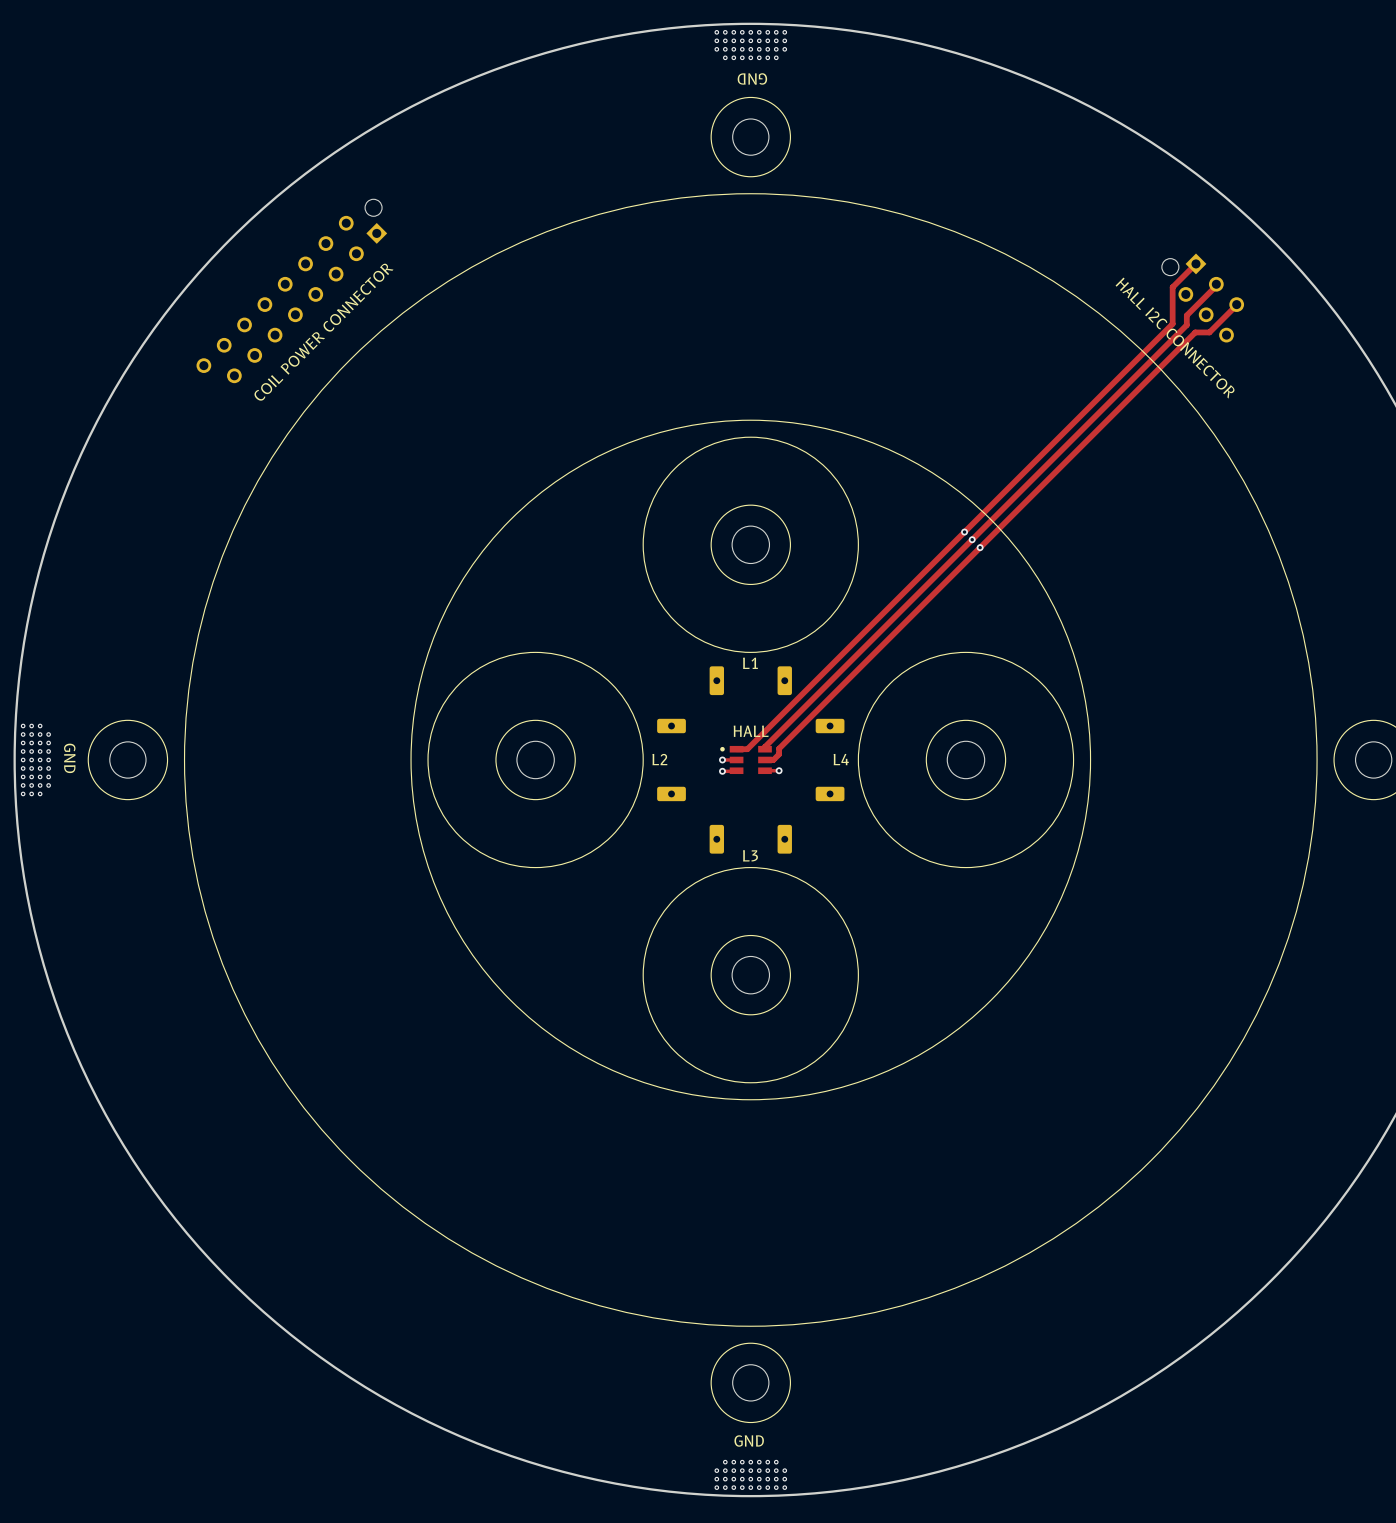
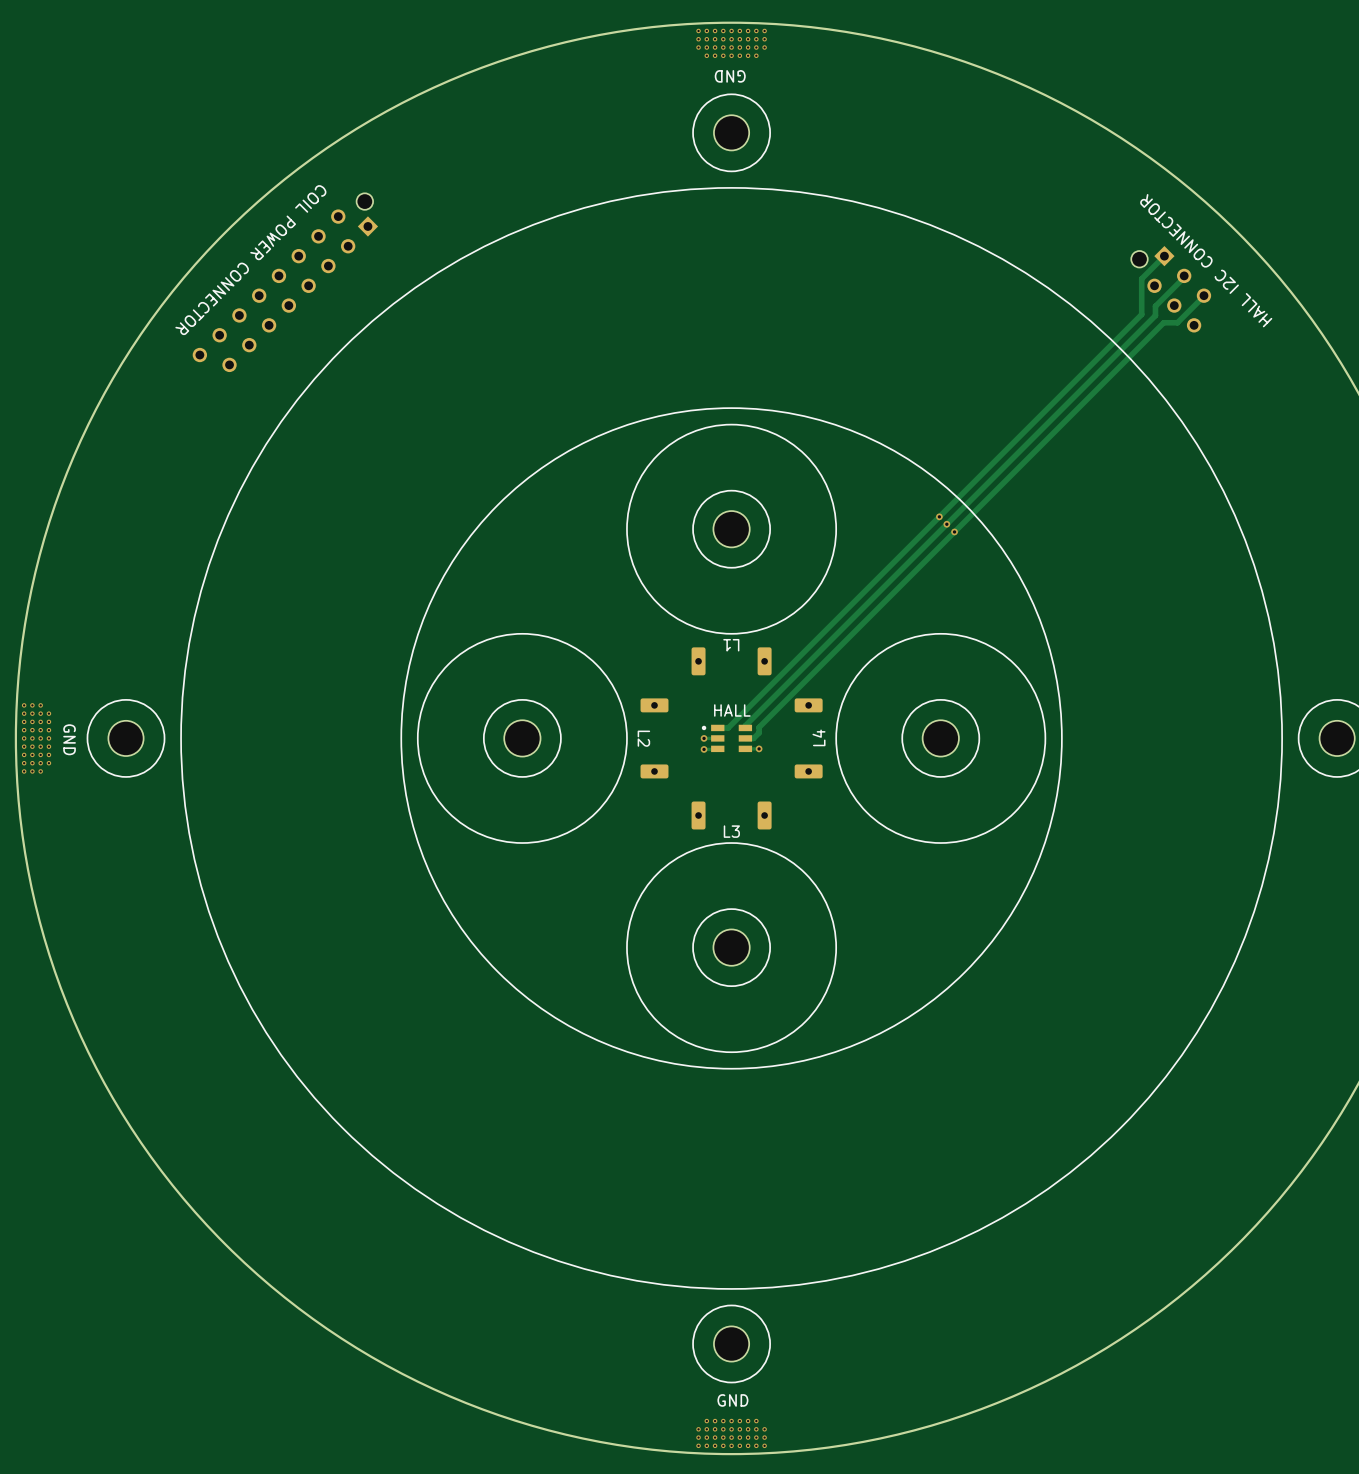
text rotation: 0° (323, 332) -> 180° (250, 260)
text rotation: 0° (1175, 338) -> 180° (1206, 260)
text rotation: 0° (750, 663) -> 180° (731, 645)
L2 name rotation: 0° (659, 759) -> 90° clockwise (643, 738)
text rotation: 0° (841, 759) -> 90° counterclockwise (818, 737)

